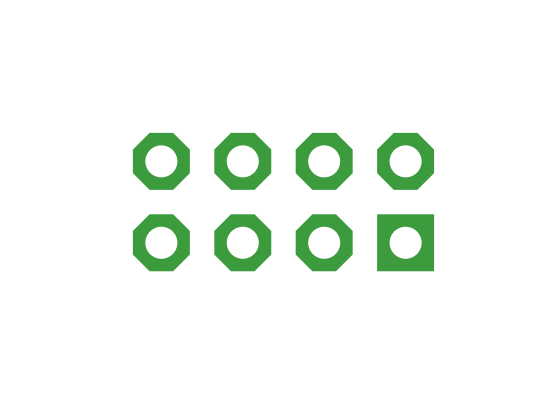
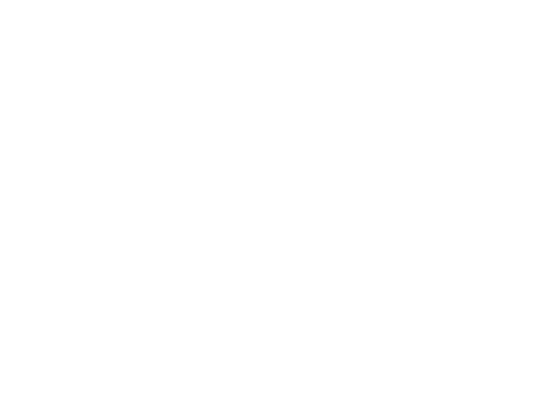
part: (283, 202) -> none

